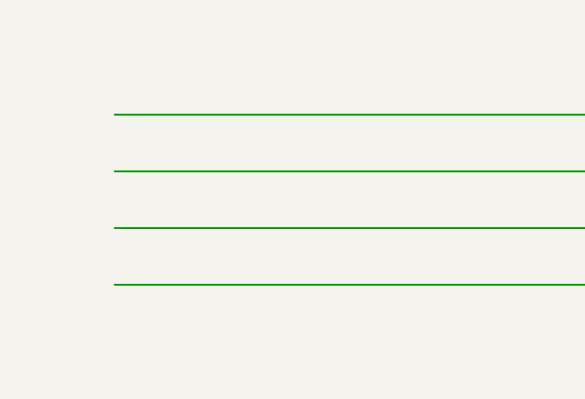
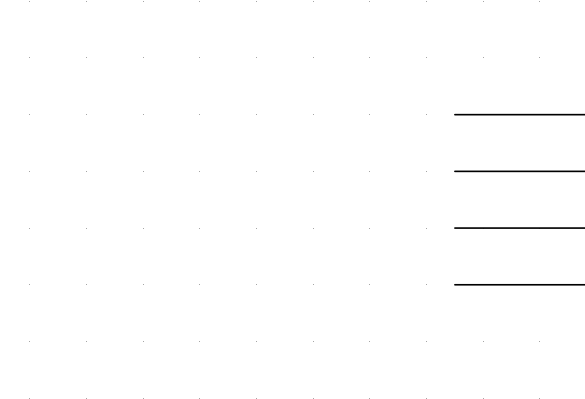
wire: (114, 114) (454, 114) -> none
wire: (114, 171) (454, 171) -> none
wire: (114, 228) (454, 228) -> none
wire: (114, 284) (454, 284) -> none

